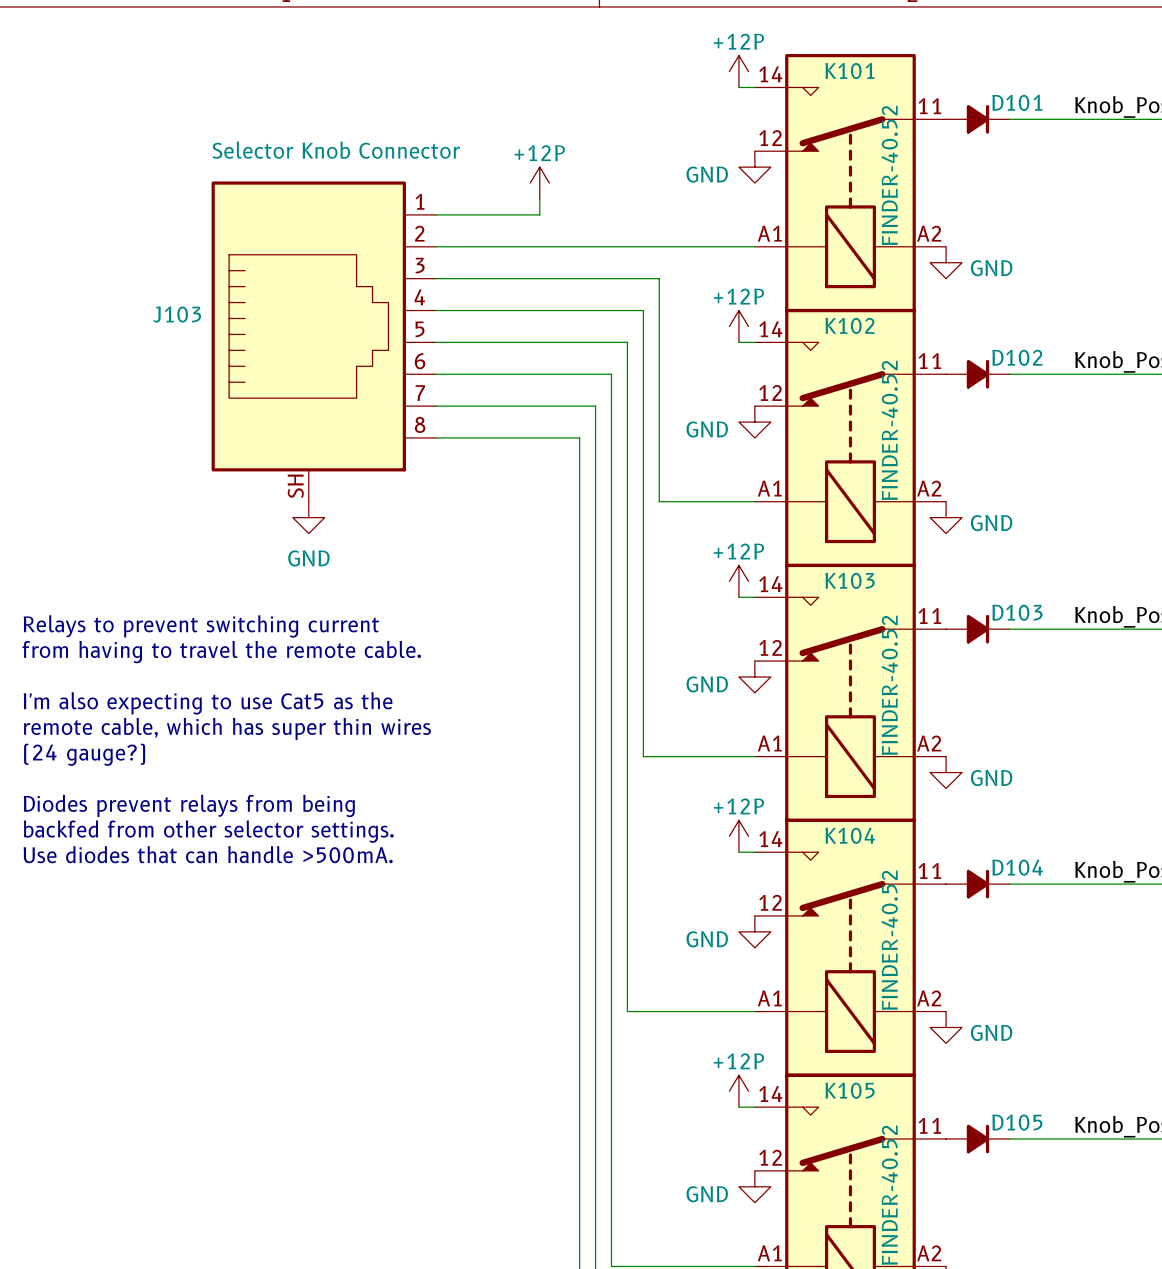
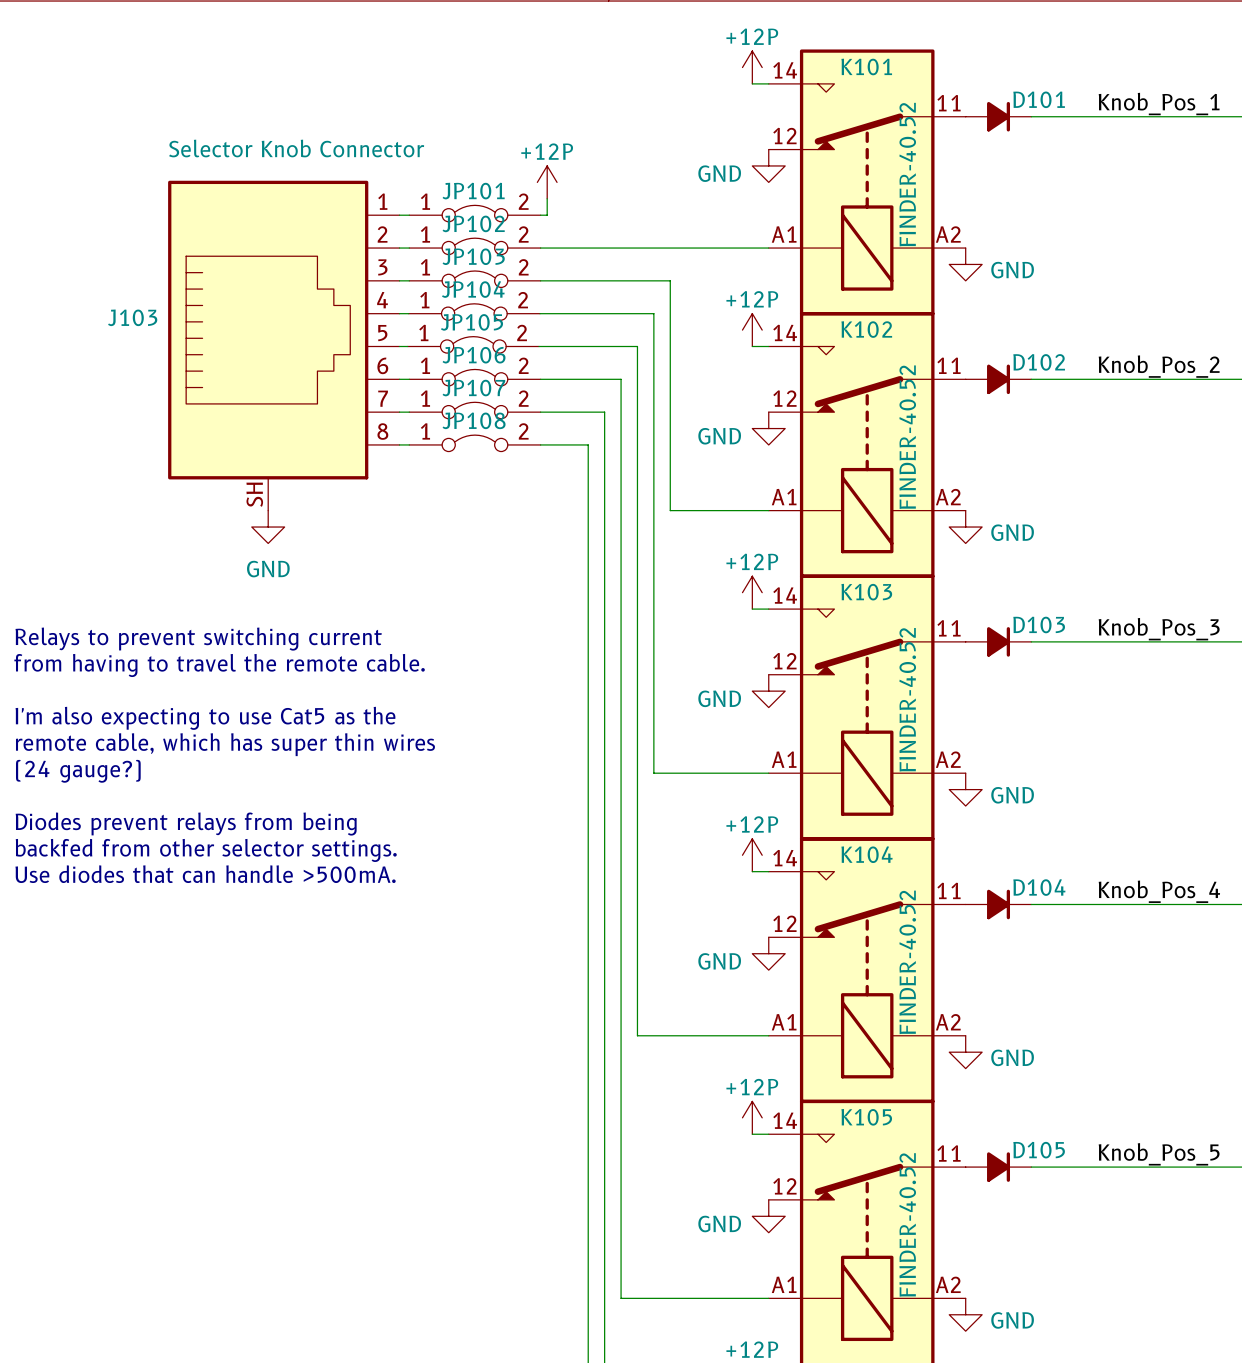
JP101: none -> (474, 213)
wire: (436, 214) (533, 214) -> none
JP102: none -> (474, 246)
wire: (436, 246) (533, 246) -> none
JP103: none -> (474, 279)
wire: (436, 278) (533, 278) -> none
JP104: none -> (474, 312)
wire: (436, 310) (532, 310) -> none
JP105: none -> (473, 344)
J103 position: (323, 341) -> (283, 345)
wire: (436, 342) (531, 342) -> none
JP106: none -> (474, 377)
wire: (436, 374) (533, 374) -> none
JP107: none -> (474, 410)
wire: (436, 406) (533, 406) -> none
JP108: none -> (474, 443)
wire: (436, 437) (533, 437) -> none
power symbol position: GND (308, 517) -> GND (268, 527)

